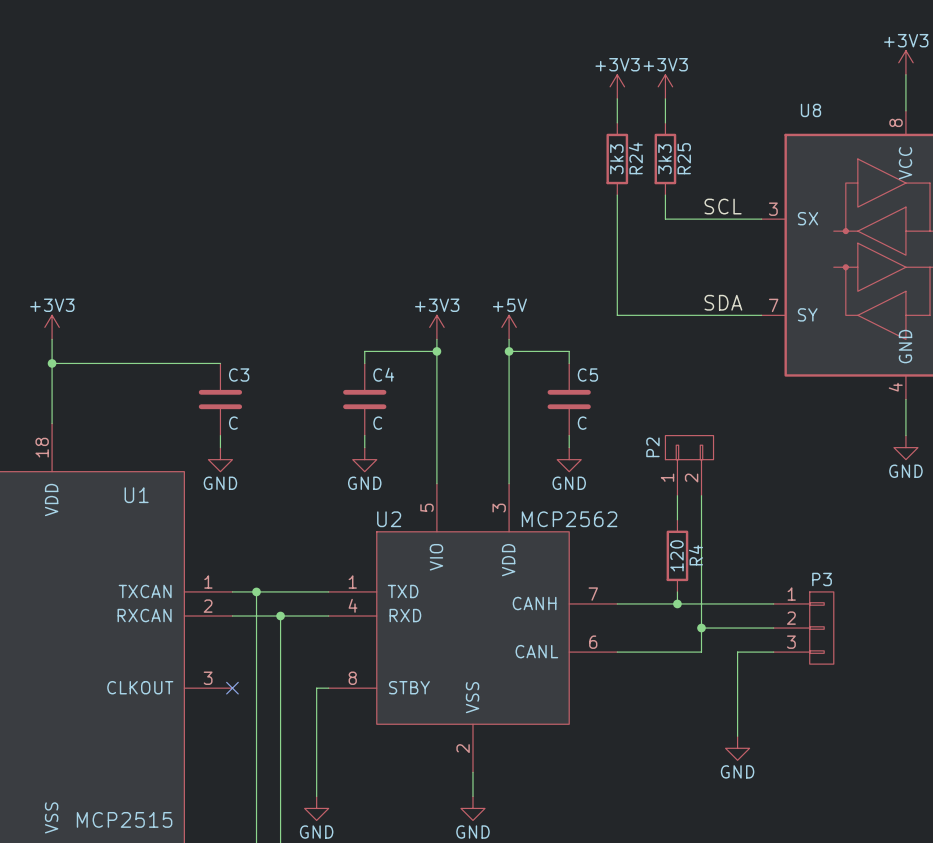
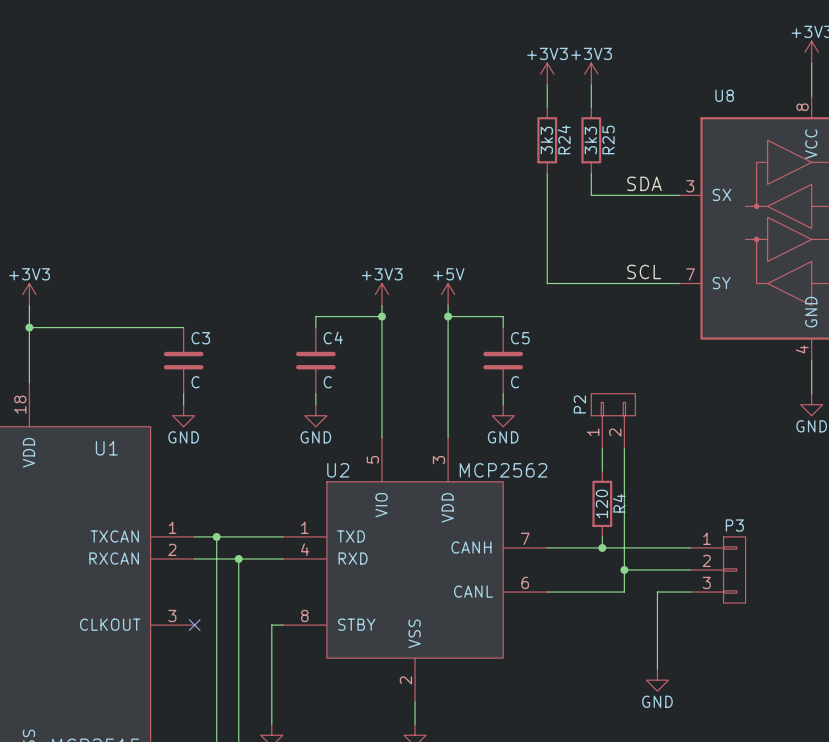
label: SCL (723, 206) -> SDA (644, 183)
label: SDA (723, 302) -> SCL (644, 271)

